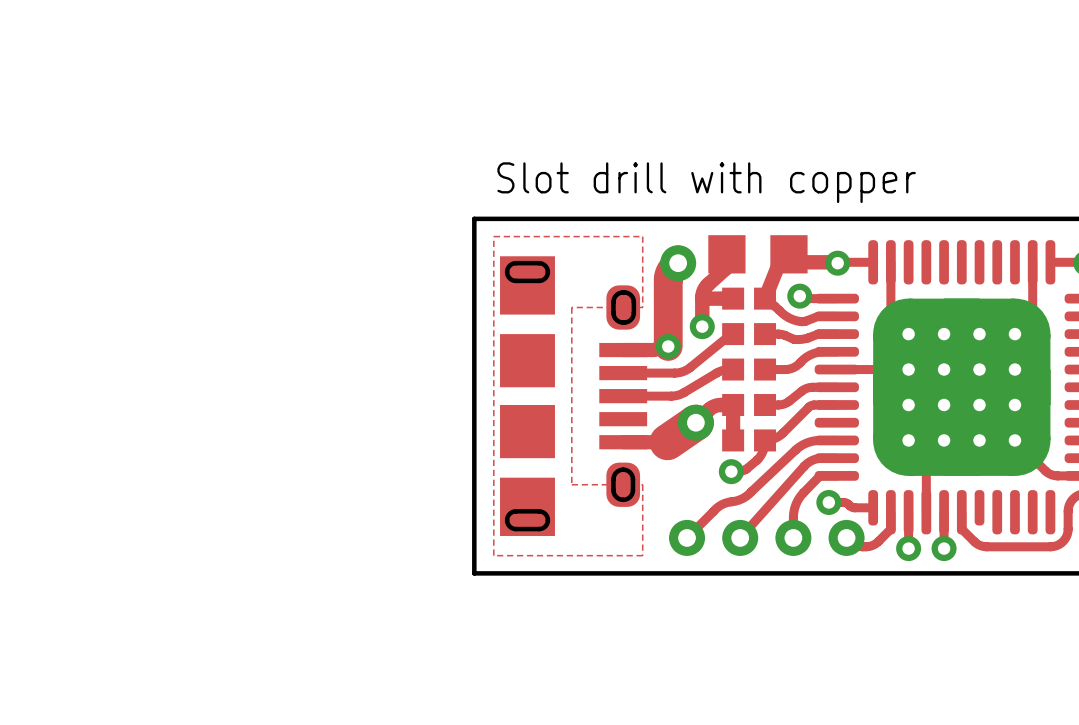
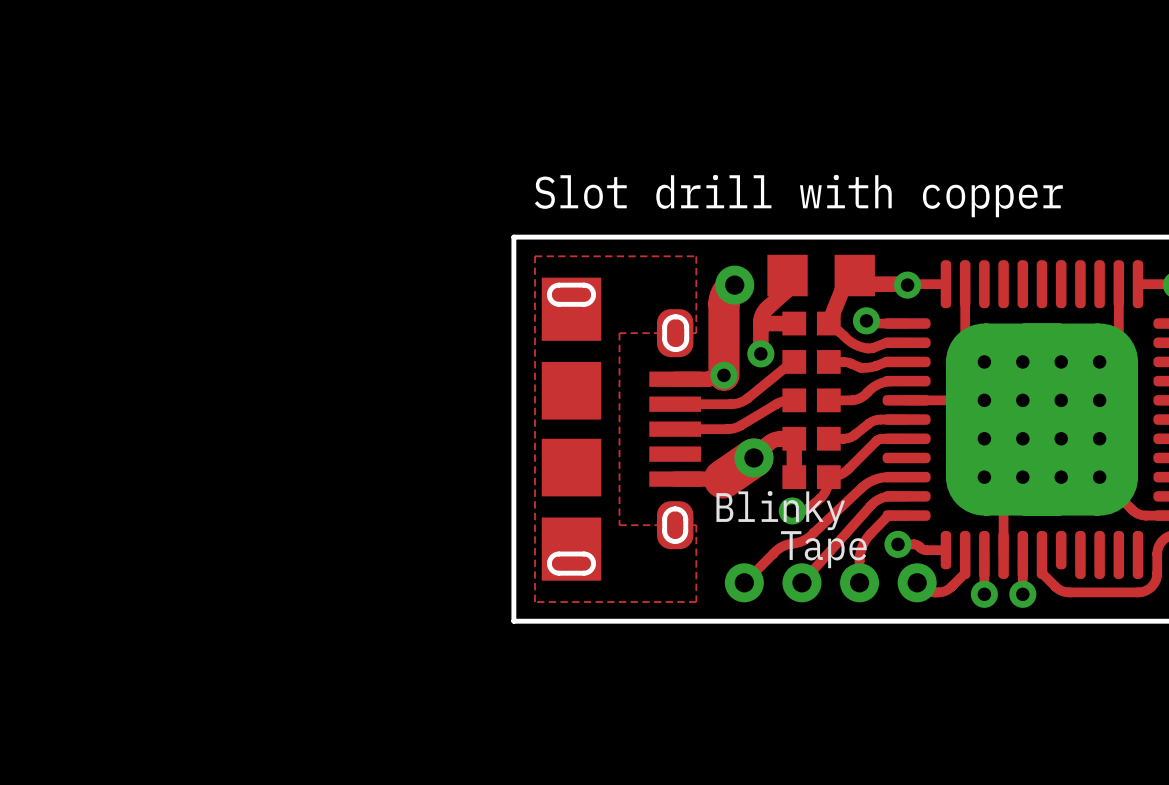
text: none -> Blinky (780, 510)
text: none -> Tape (823, 549)

